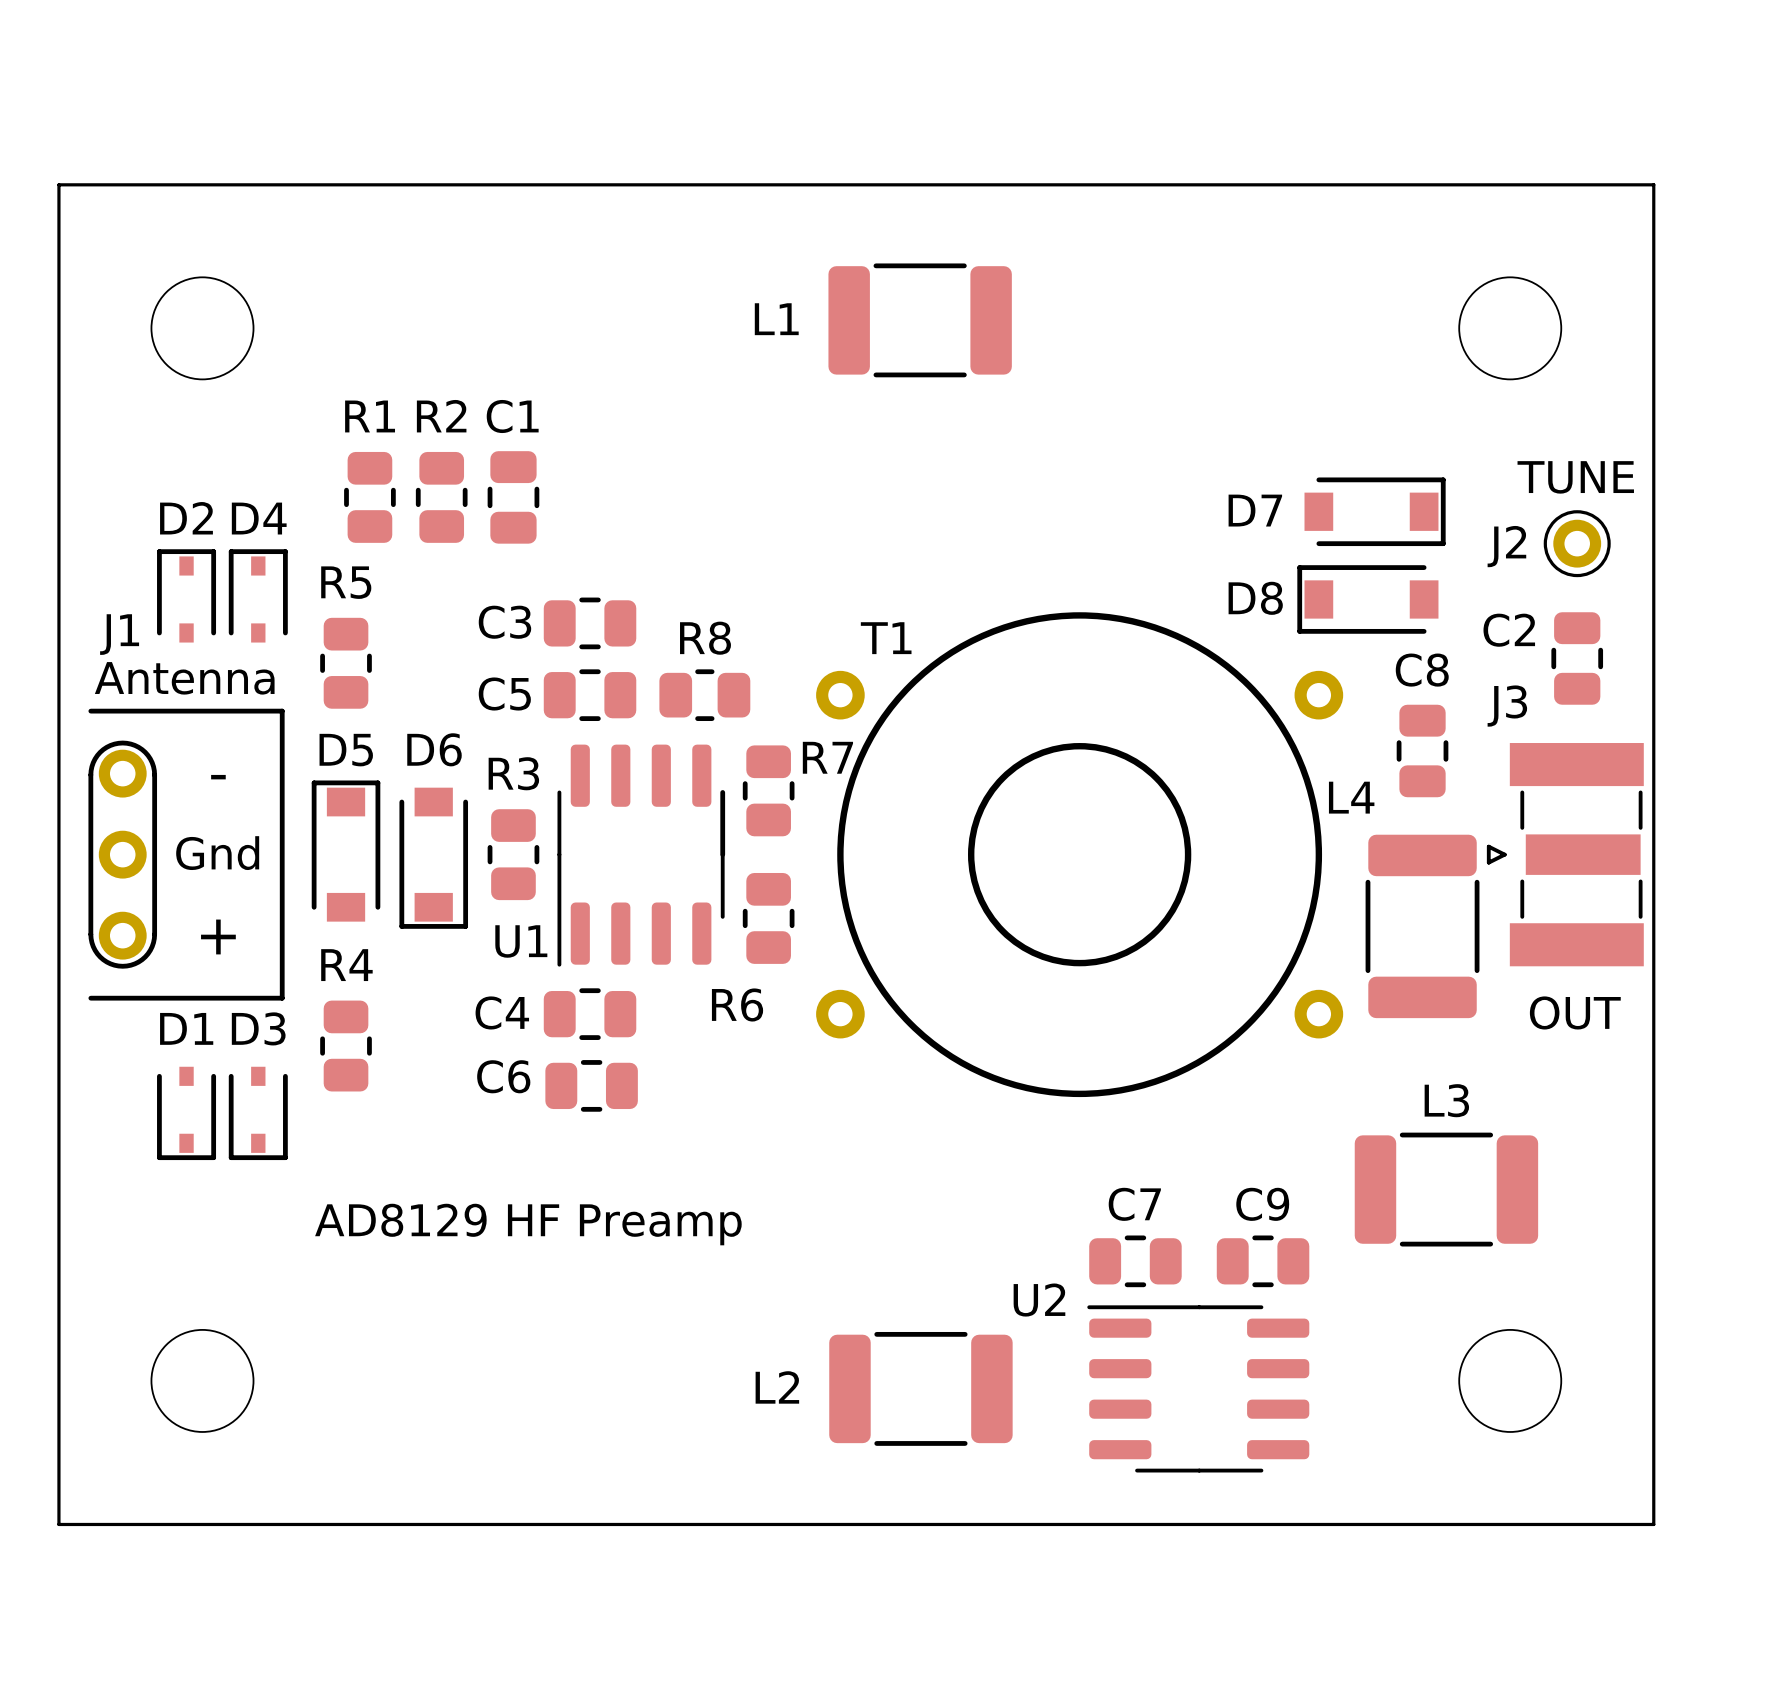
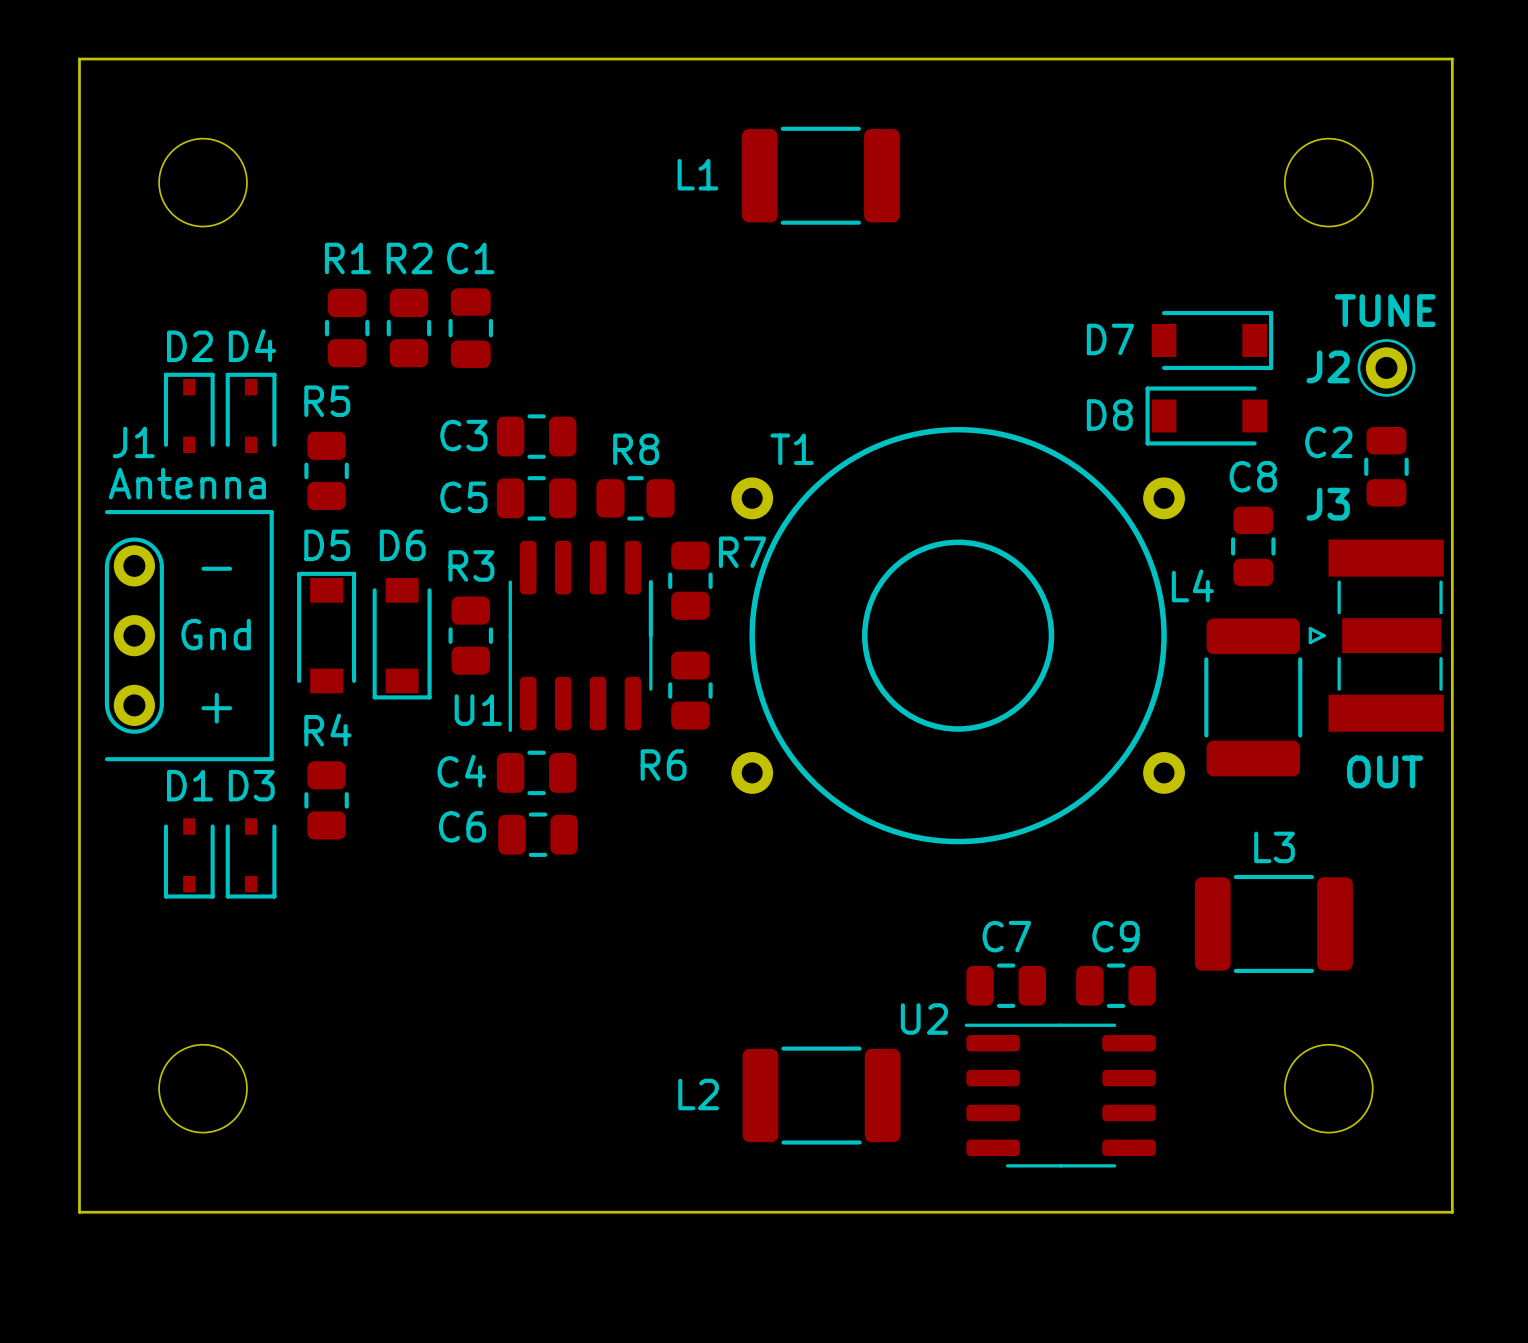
text: AD8129 HF Preamp (528, 1224) -> none

